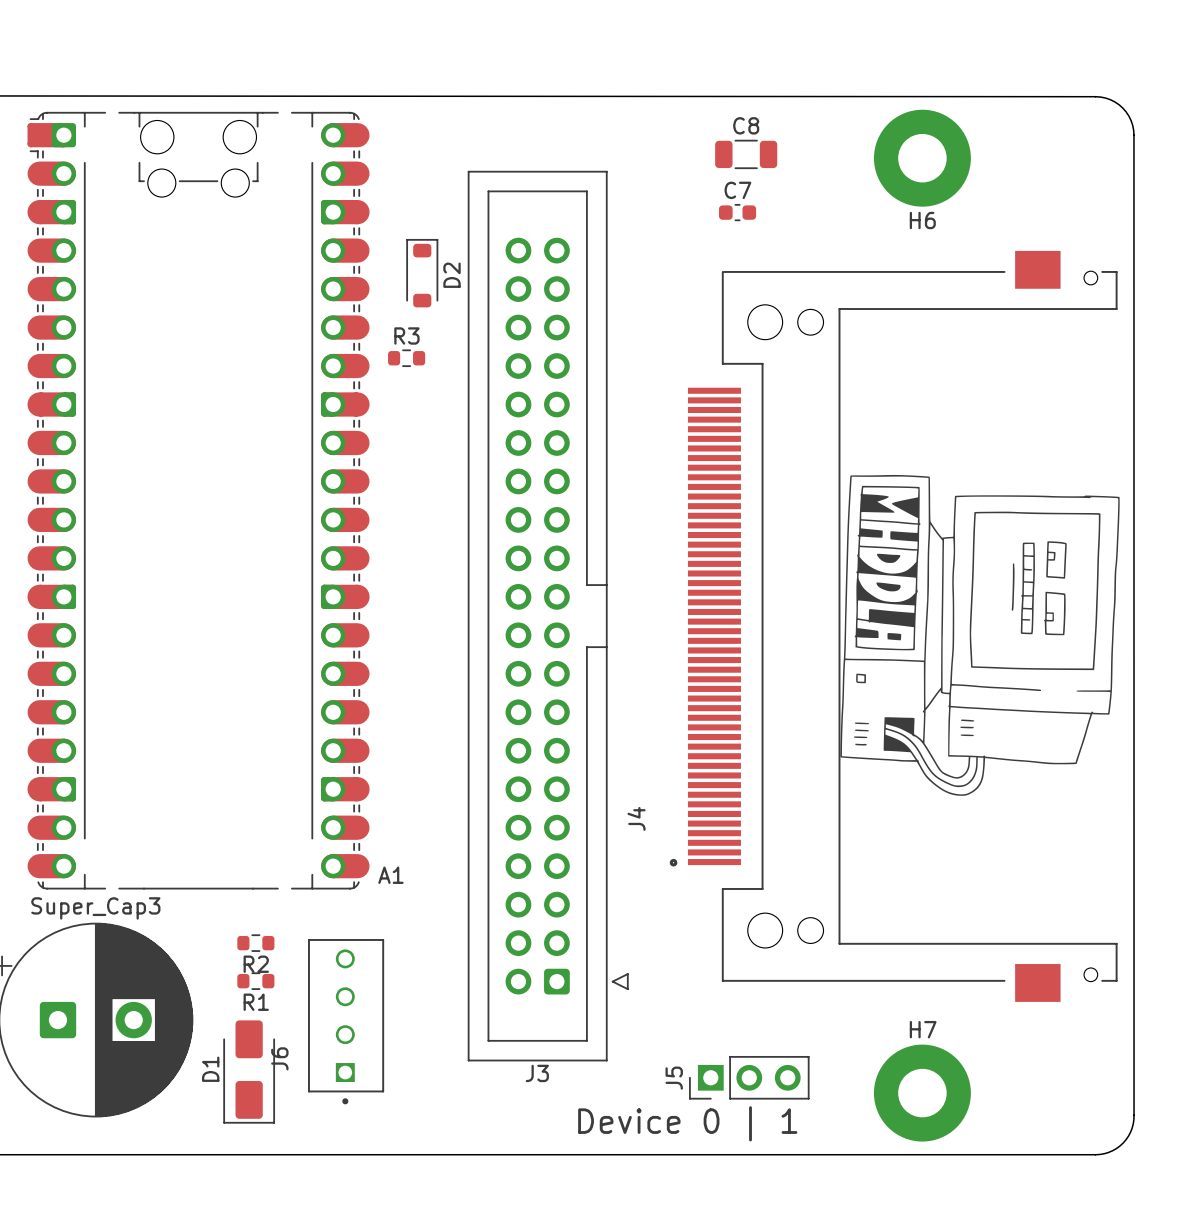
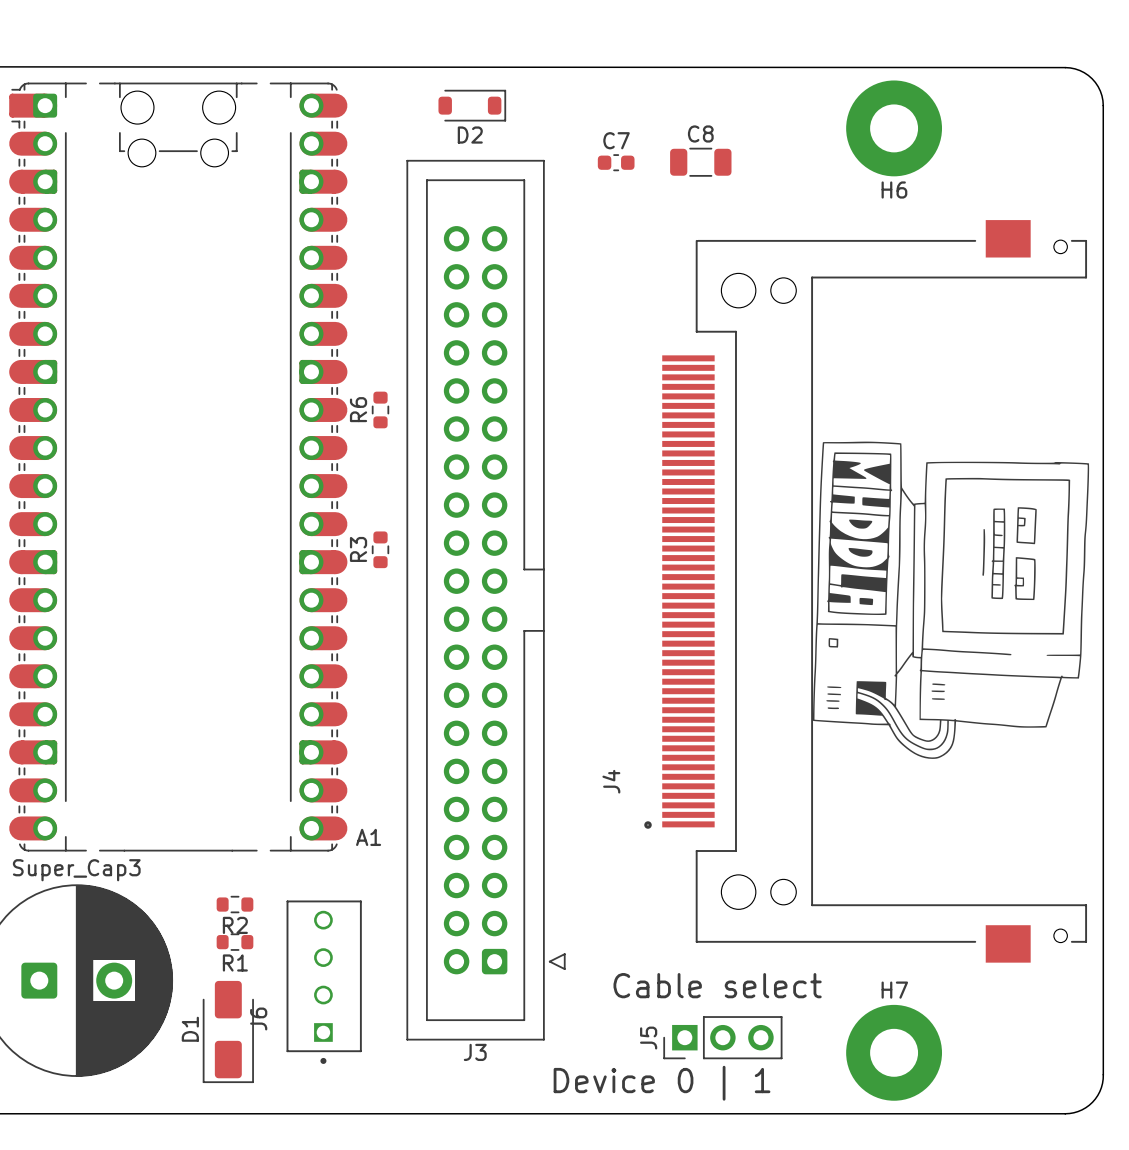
C8 position: (746, 154) -> (700, 162)
C7 position: (737, 212) -> (616, 162)
D2 rotation: 0° (422, 273) -> 90° clockwise (472, 105)
D2 position: (422, 273) -> (472, 105)
R3 name position: R3 (406, 336) -> R3 (358, 549)
R3 rotation: 0° (406, 358) -> 90° clockwise (380, 549)
R3 position: (406, 358) -> (380, 549)
R6: none -> (380, 409)
J3 position: (548, 616) -> (486, 600)
text: none -> Cable select (717, 985)

